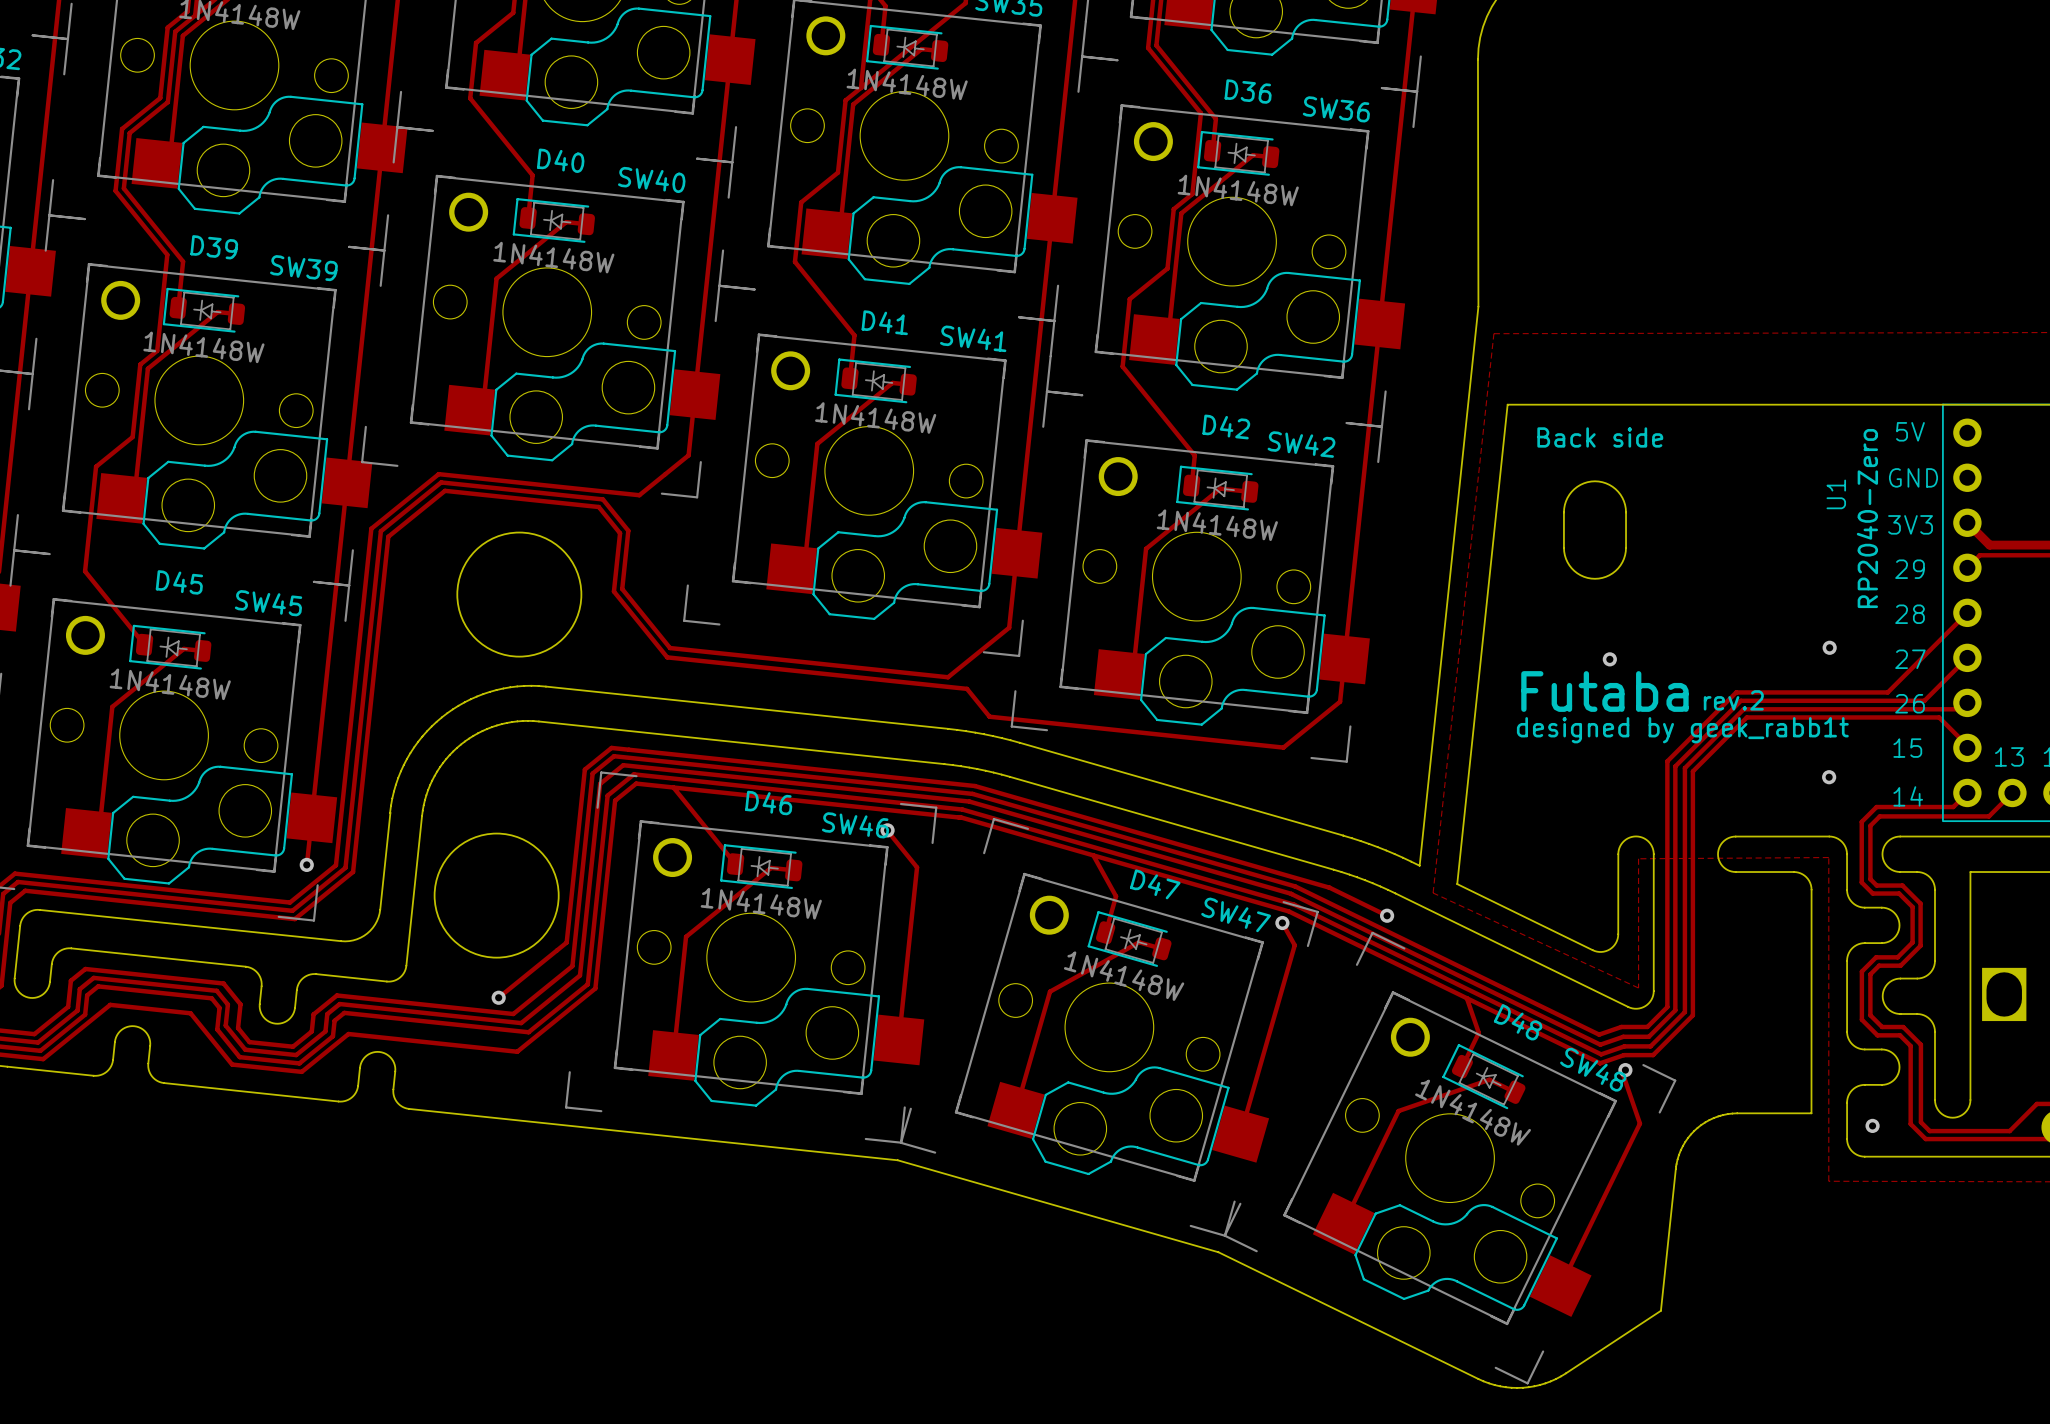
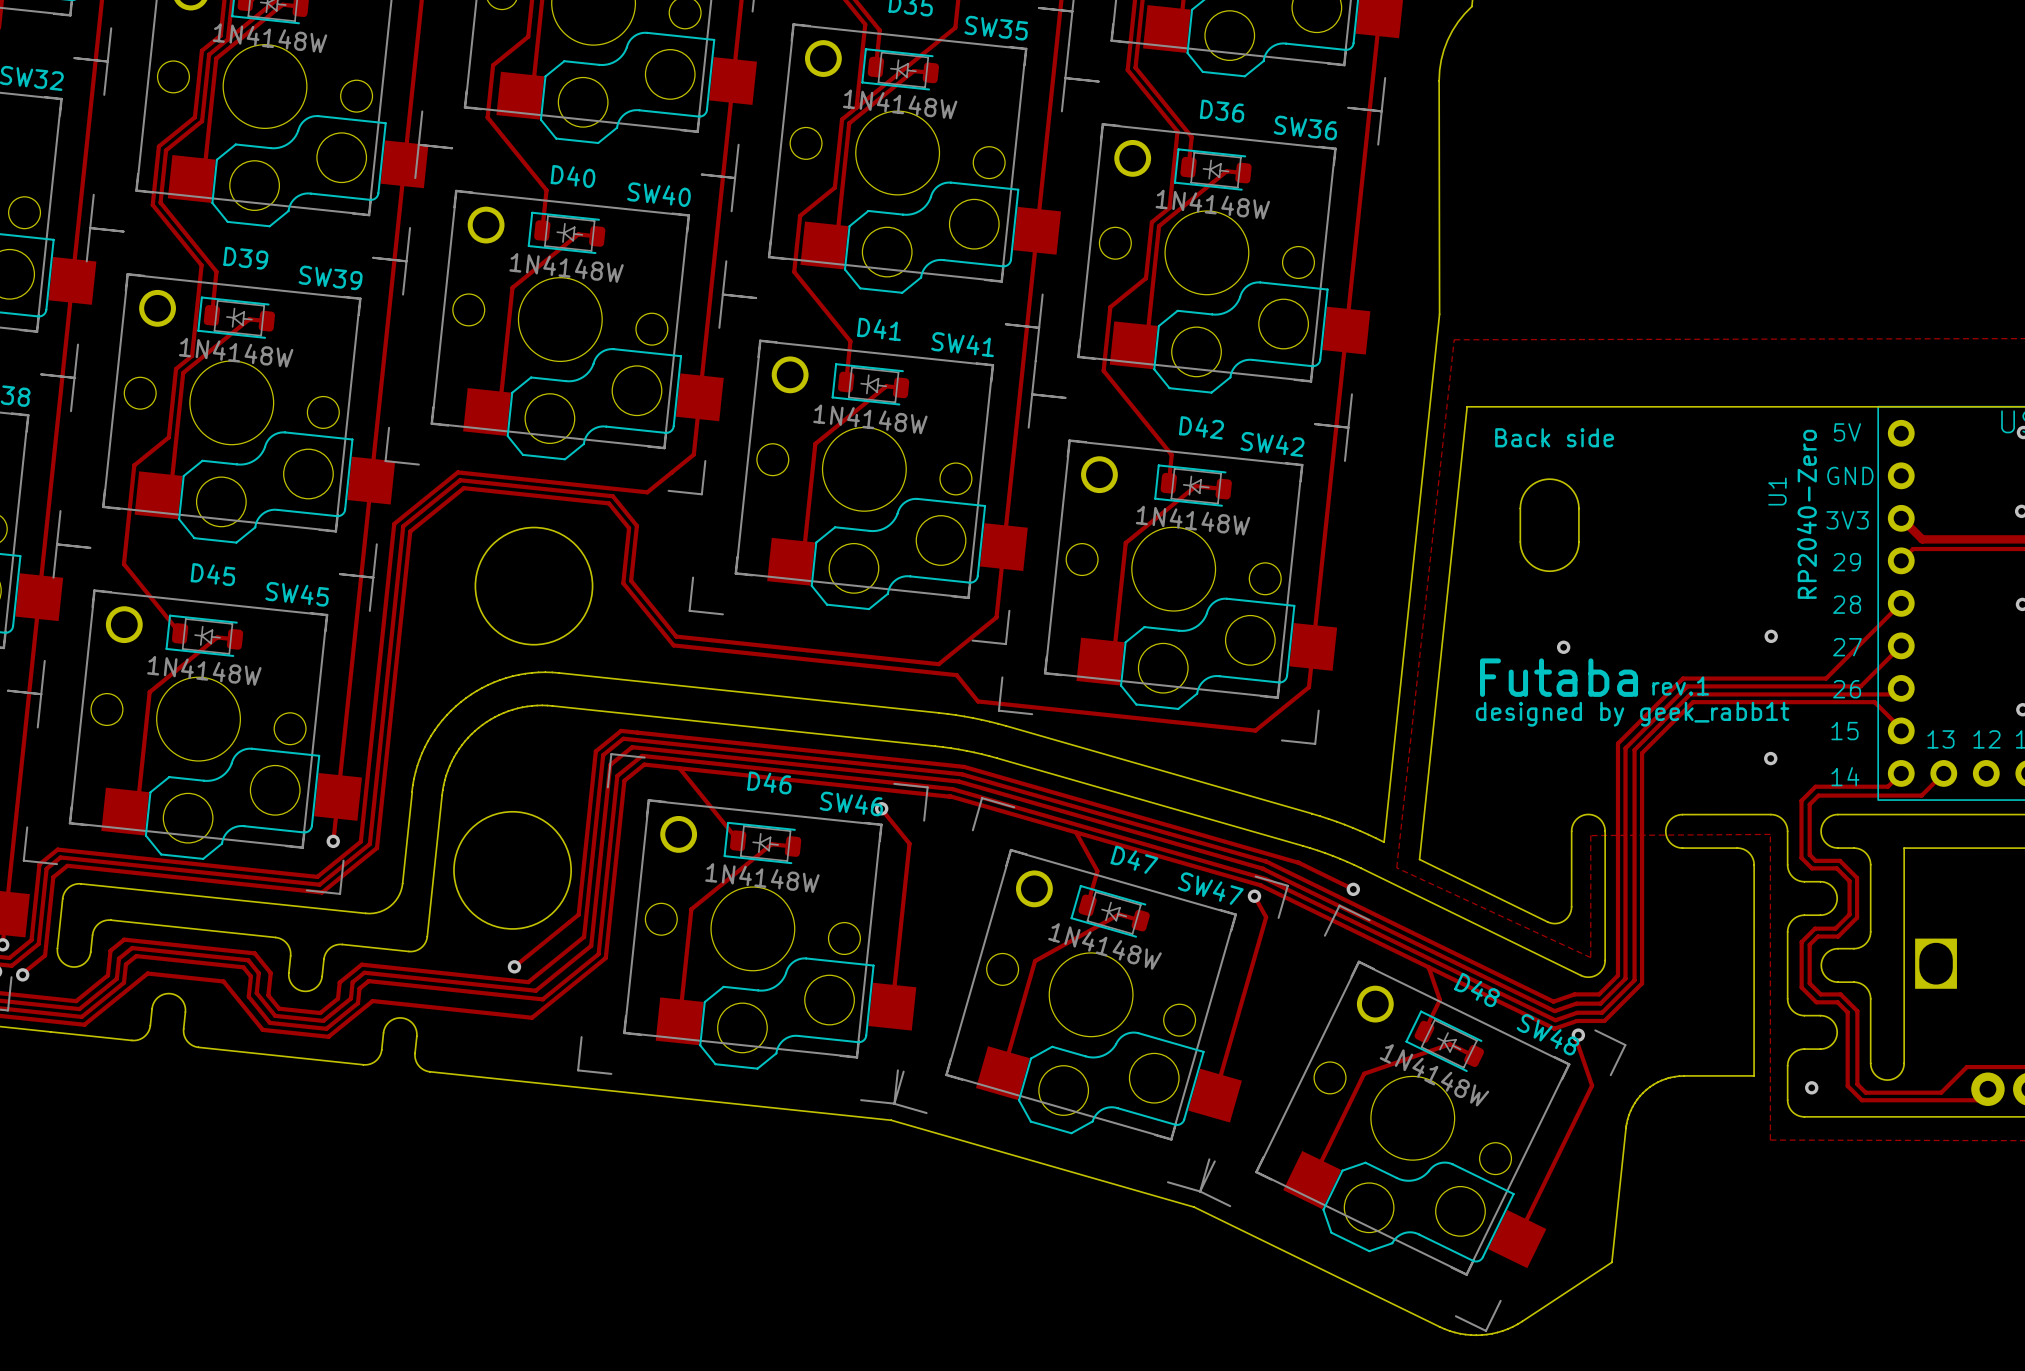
text: rev.2 (1733, 700) -> rev.1 (1680, 686)

